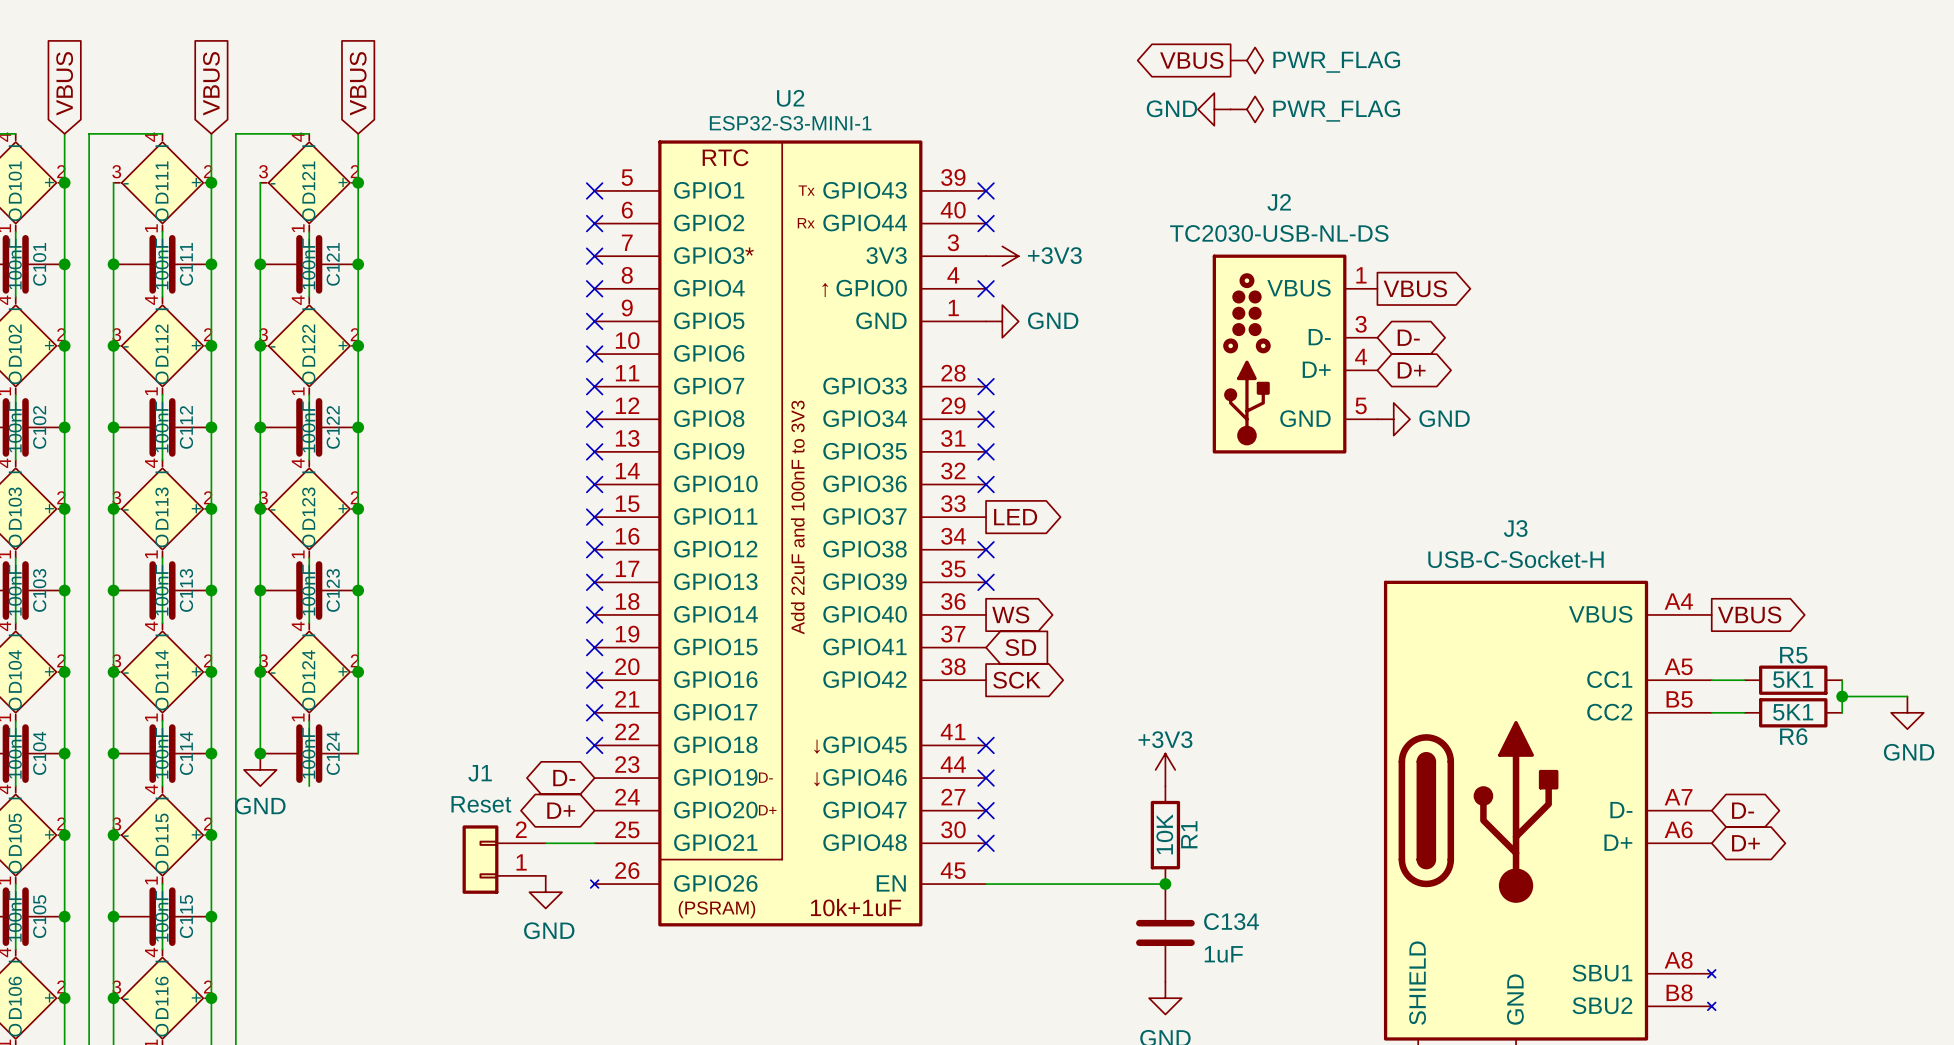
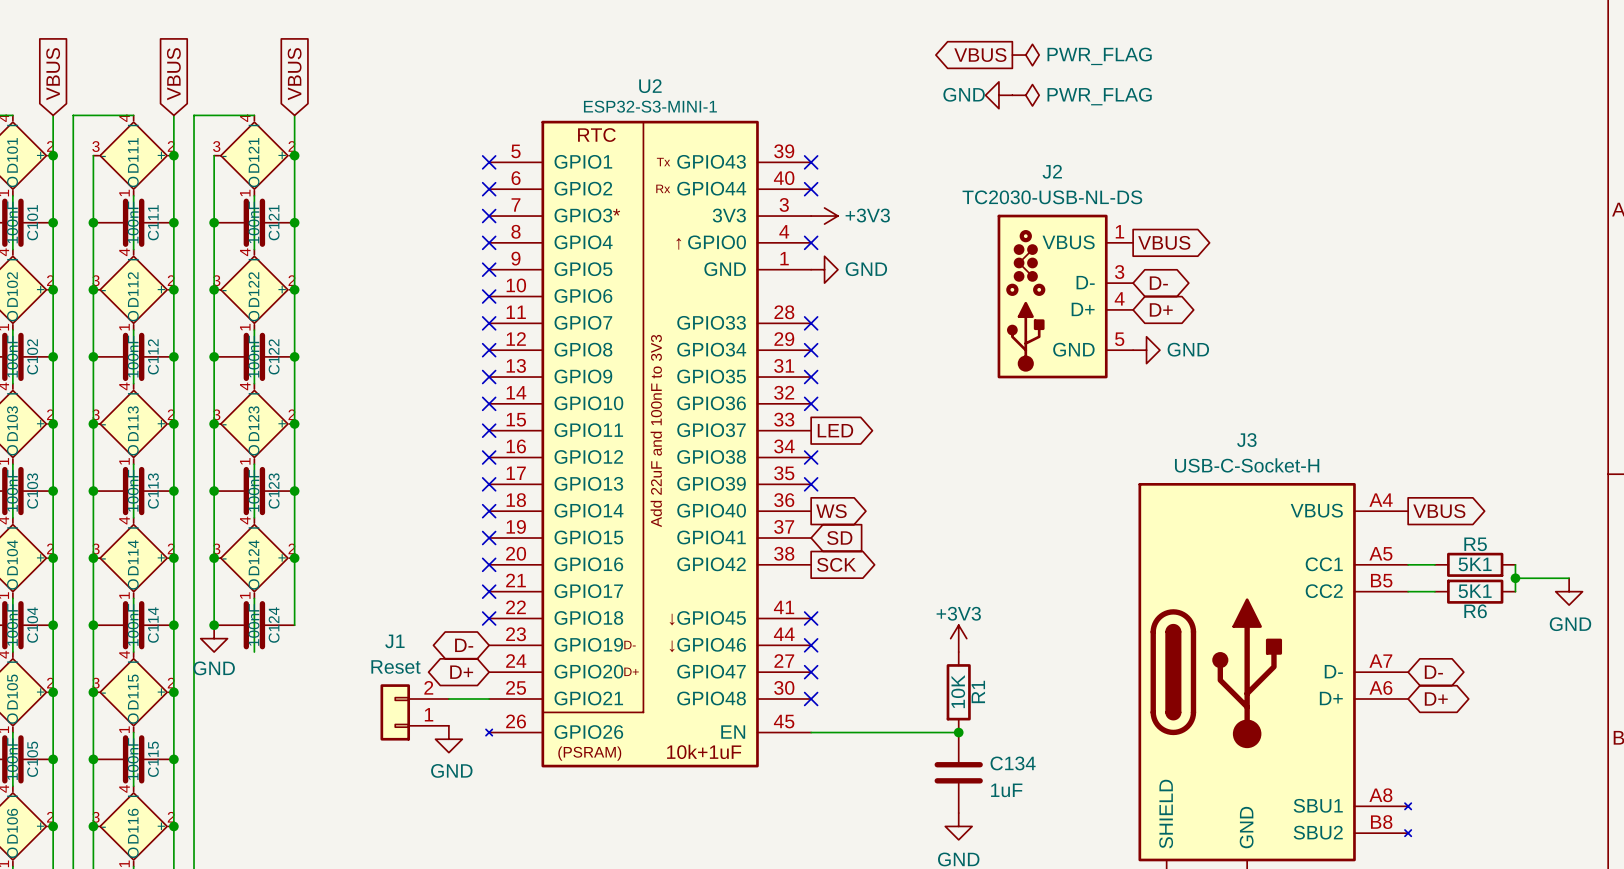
J2 symbol: [1212, 254, 1378, 454] -> [997, 214, 1134, 379]

